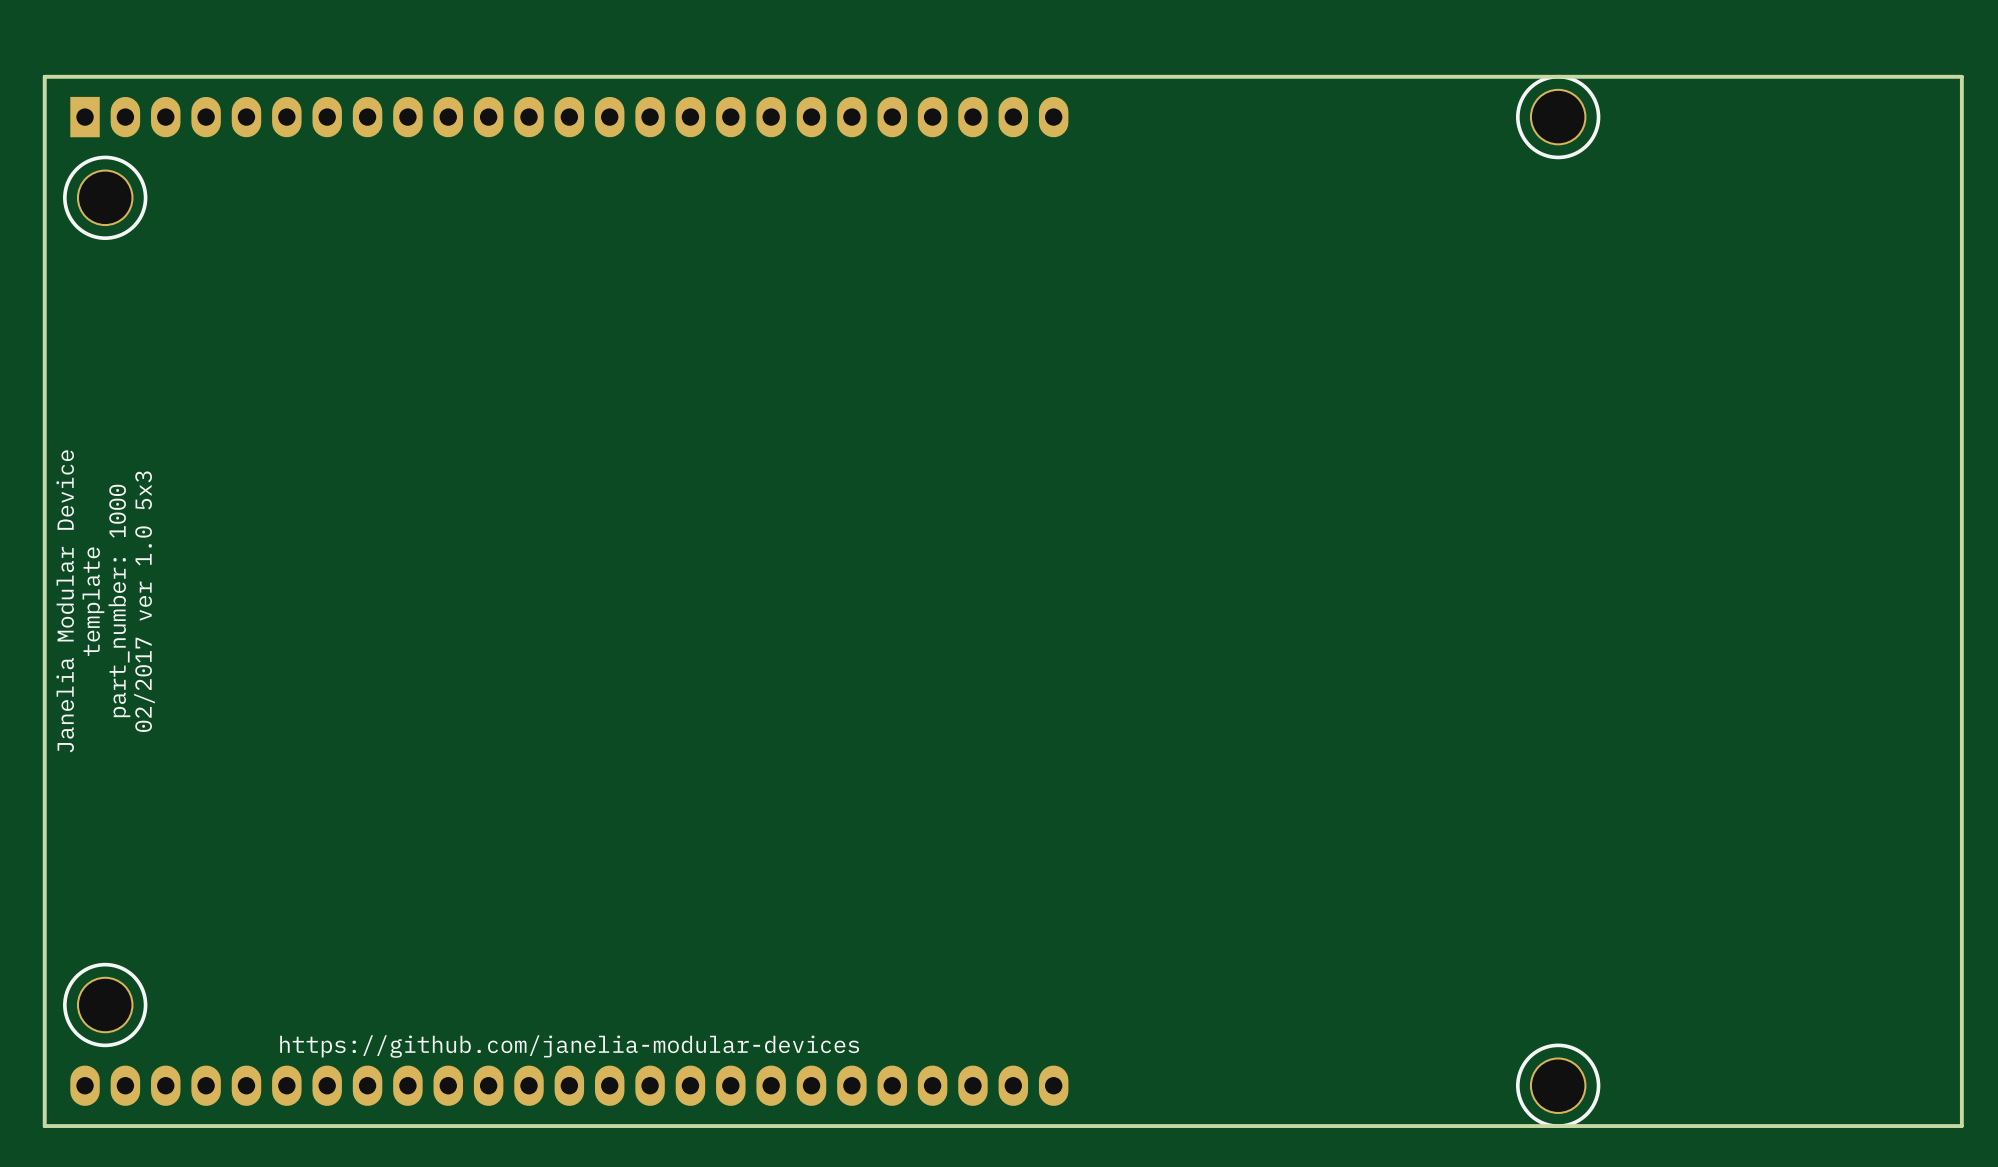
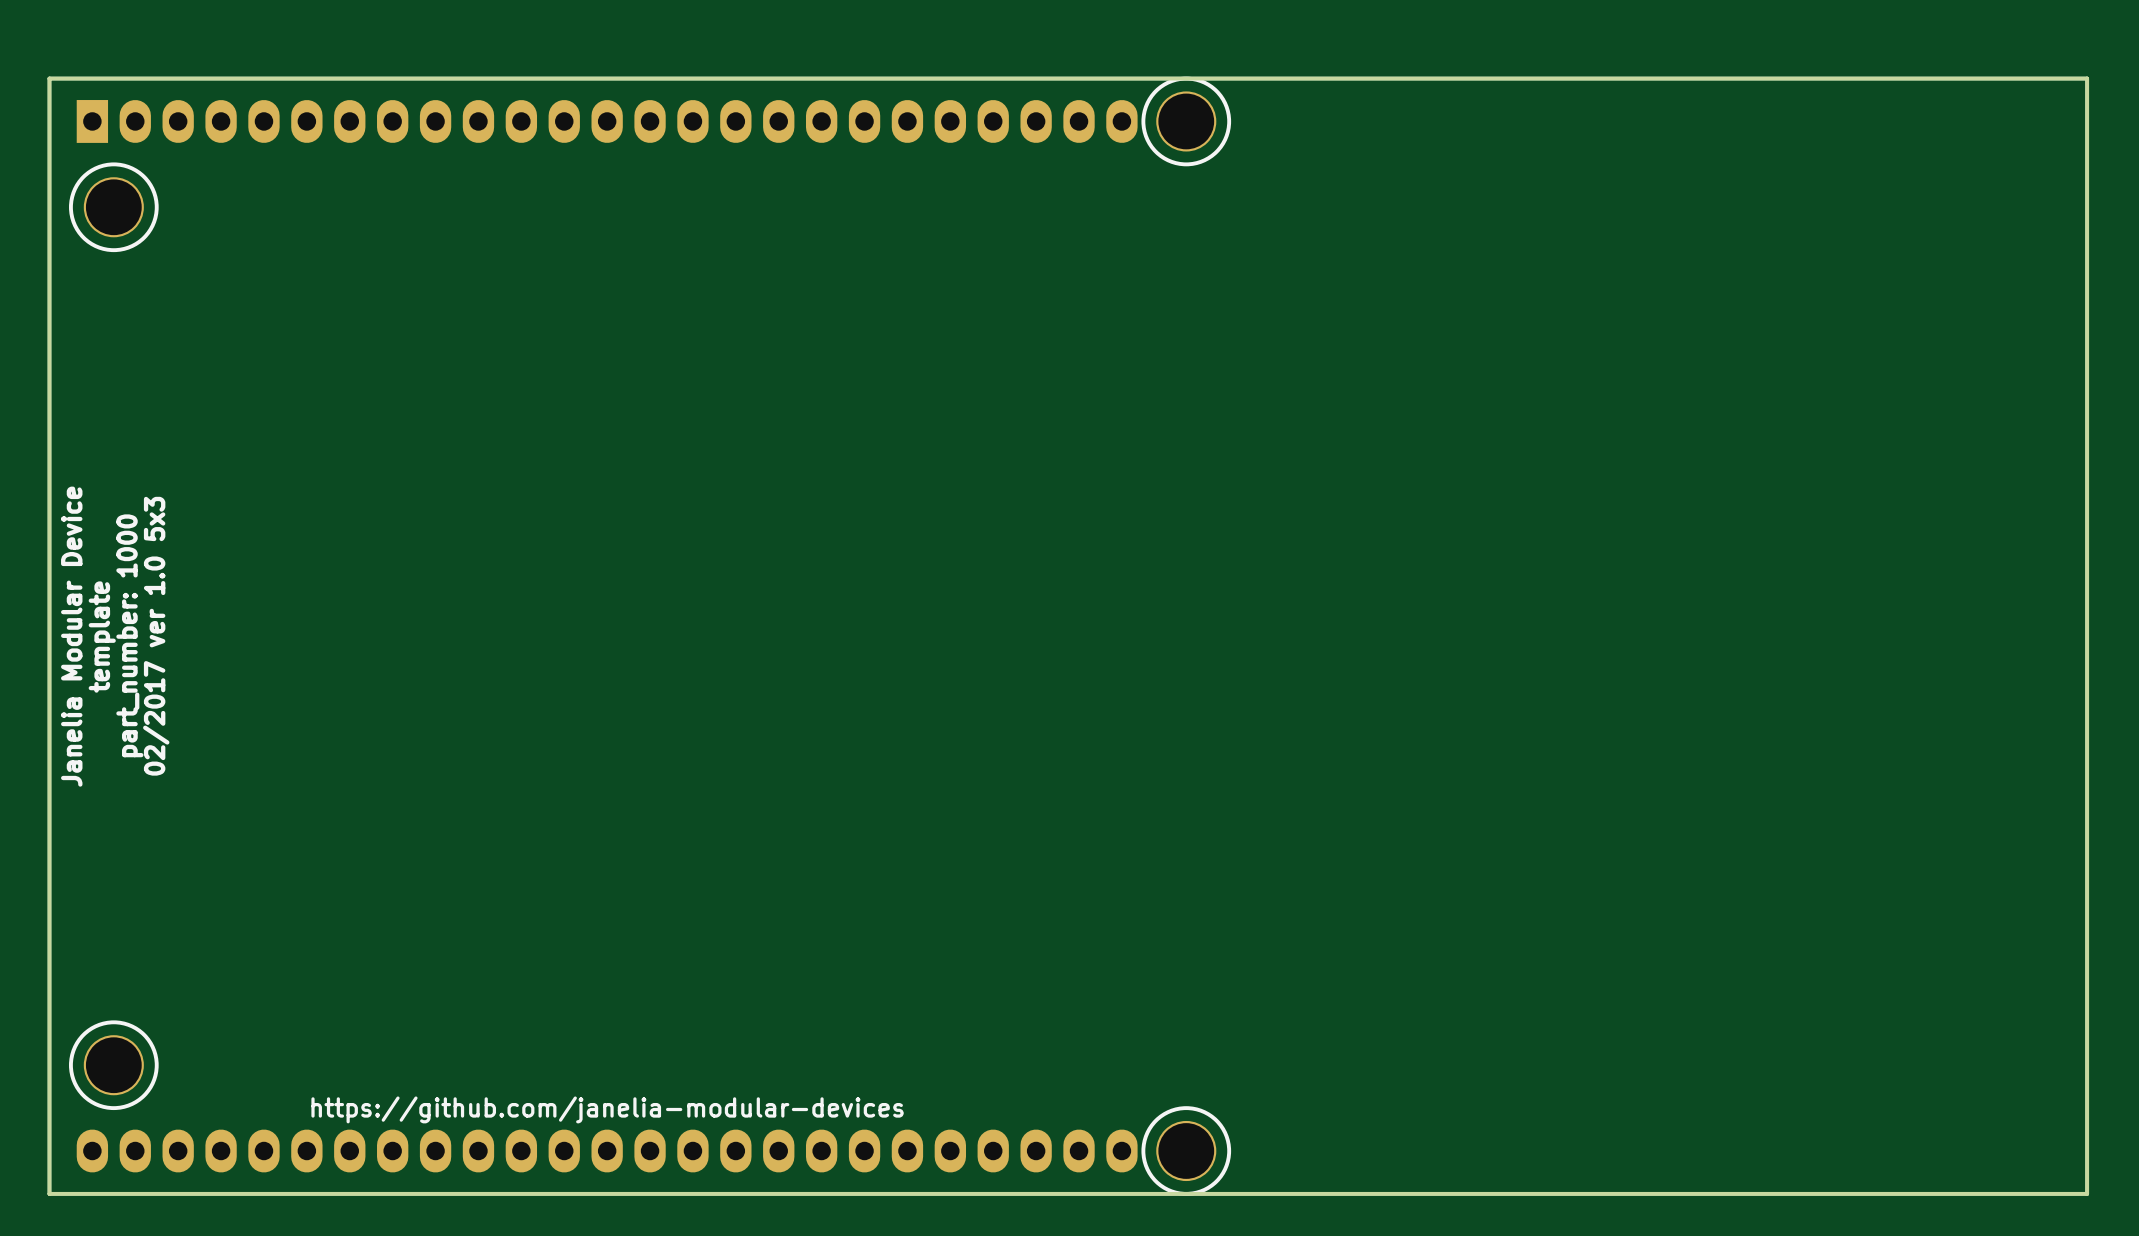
part footprint: [42, 74, 1964, 1128] -> [47, 76, 2090, 1196]

